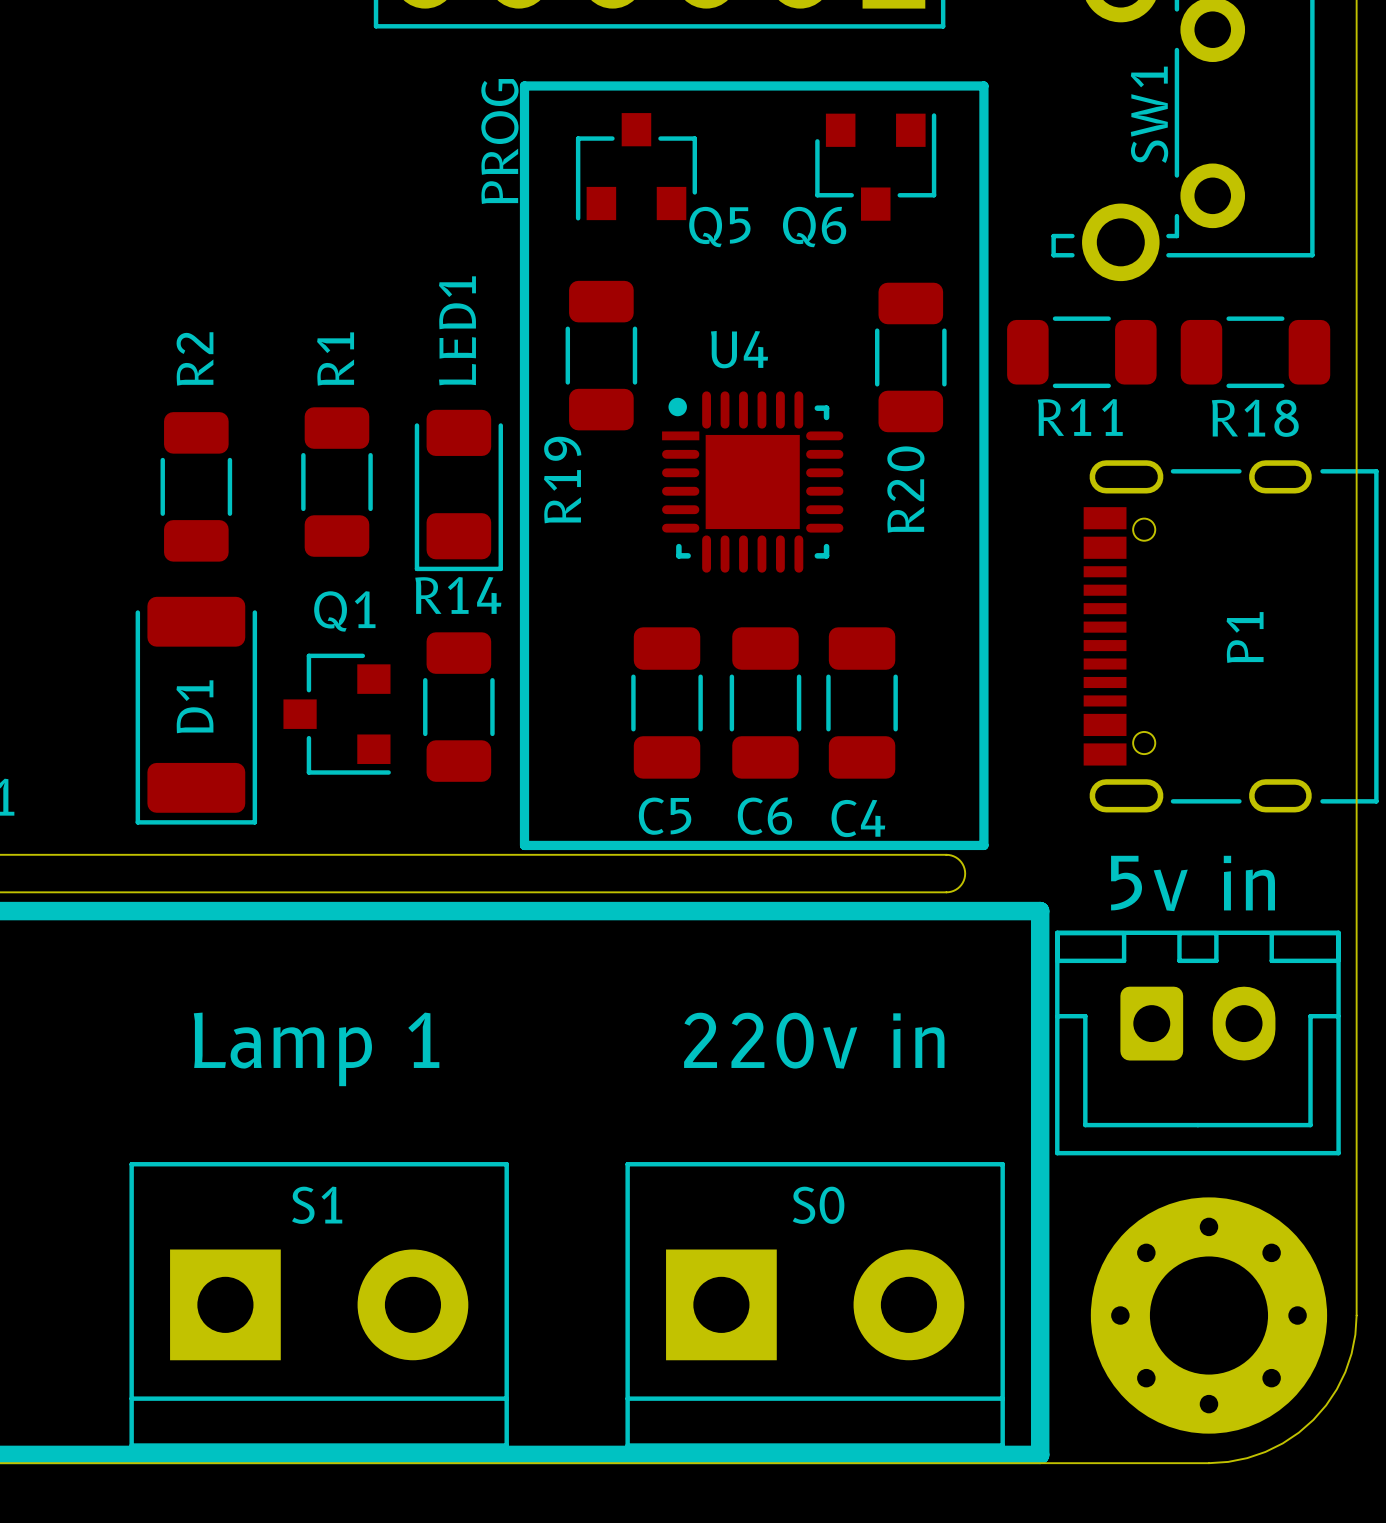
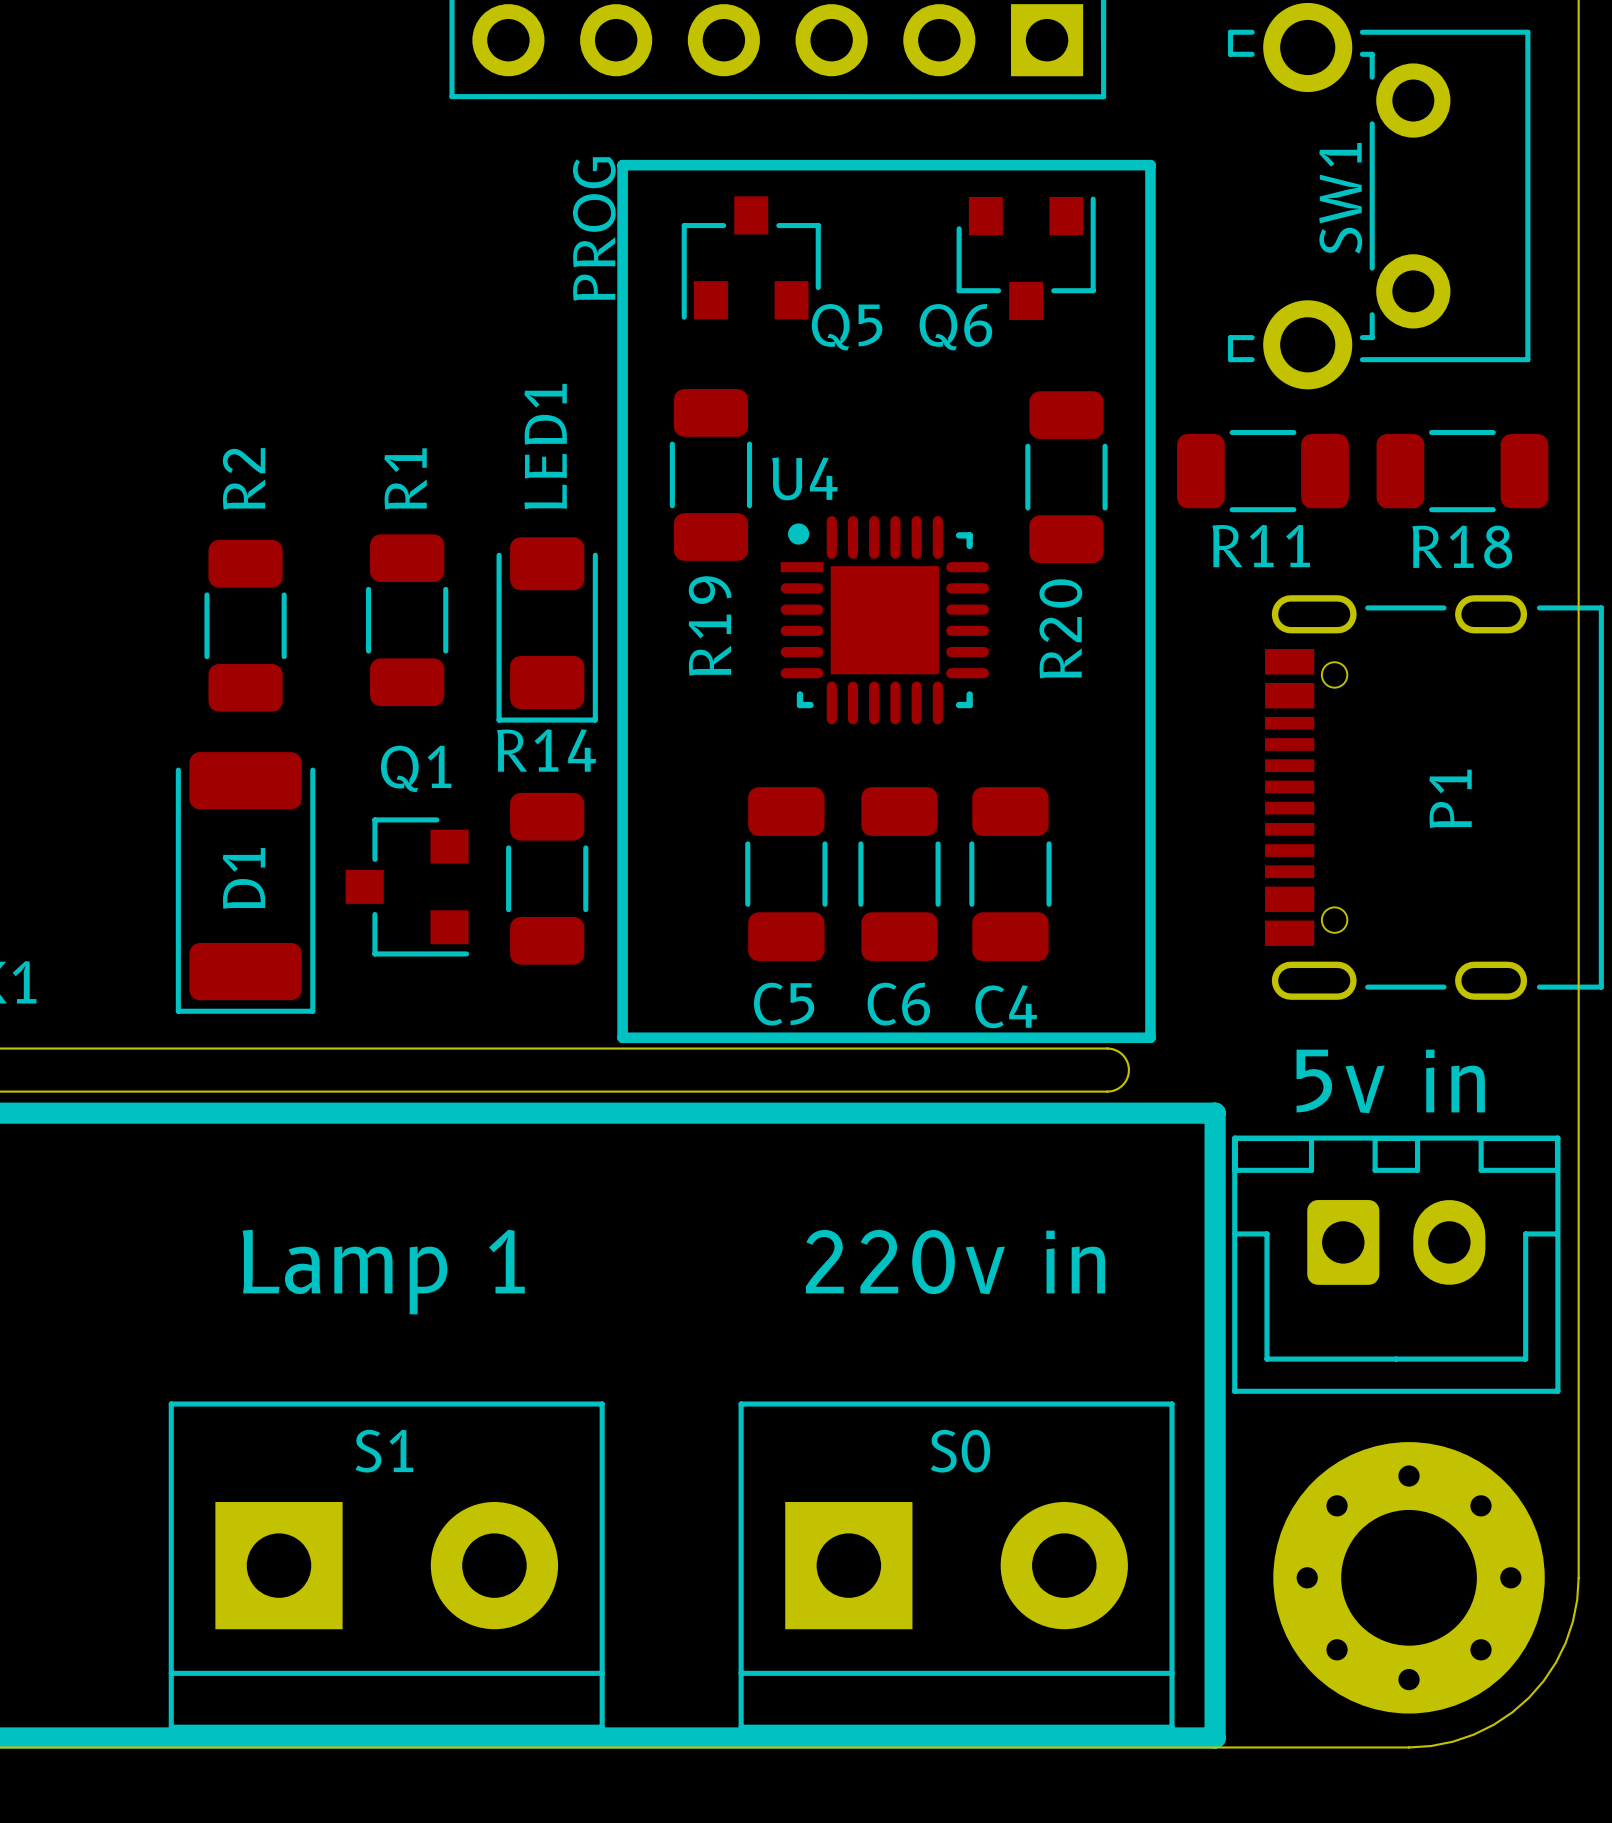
U4 name position: U4 (739, 349) -> U4 (805, 478)
R19 name position: R19 (562, 480) -> R19 (710, 626)

